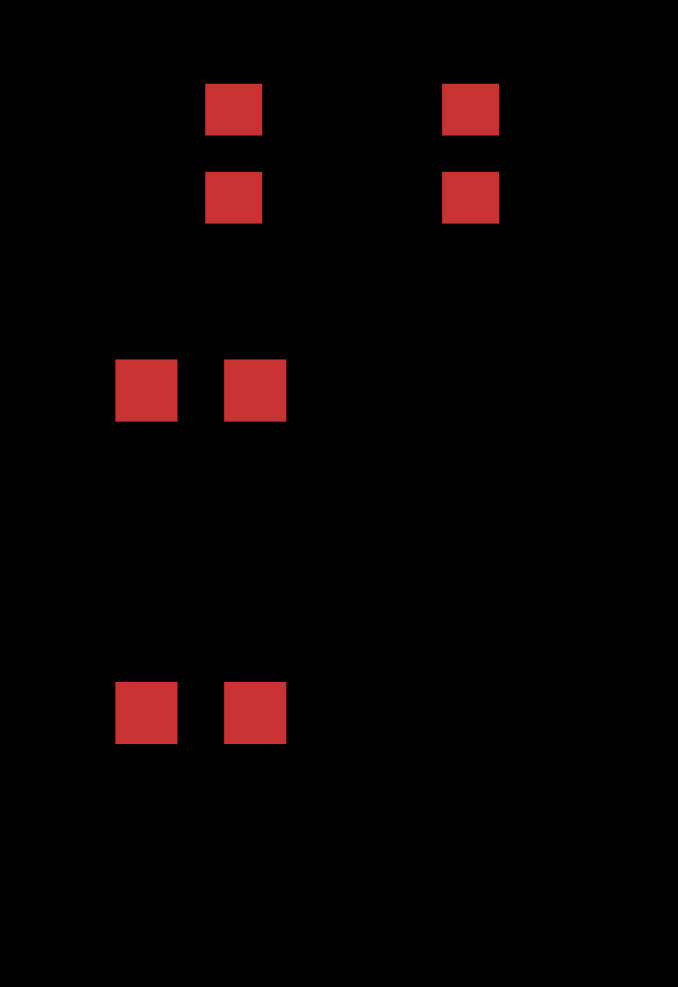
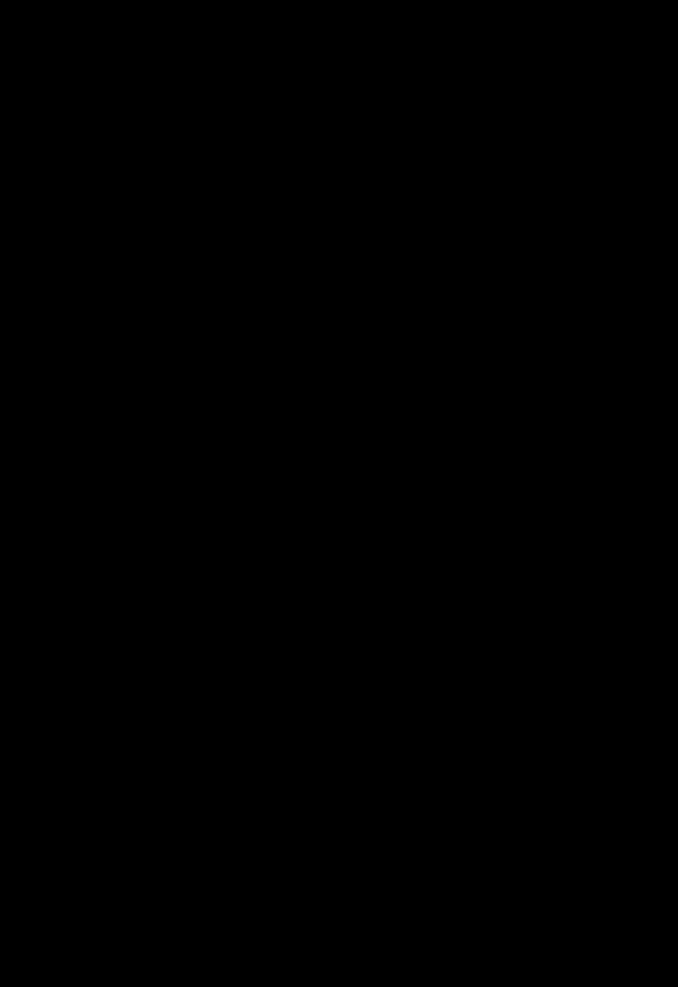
part: (233, 153) -> none
part: (470, 153) -> none
part: (200, 390) -> none
part: (200, 712) -> none

